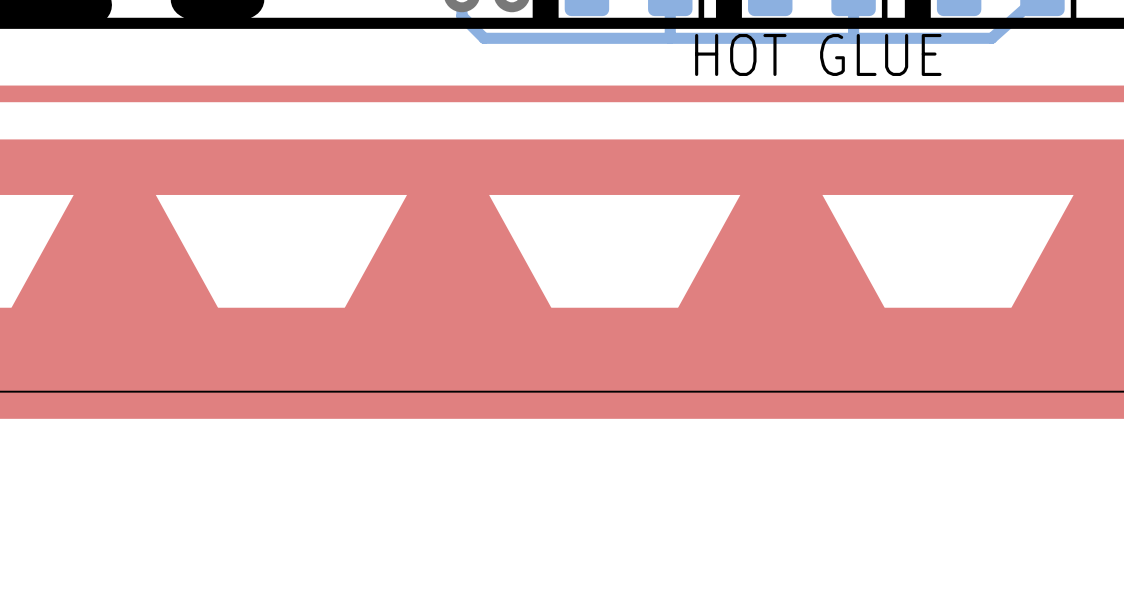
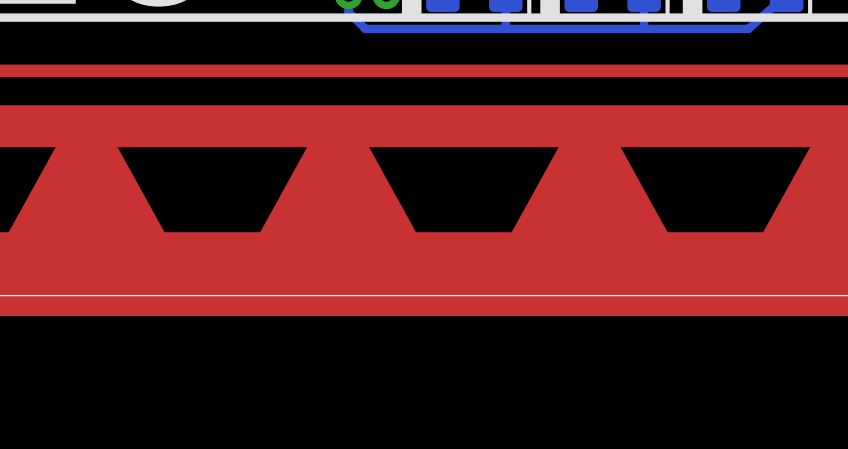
text: HOT GLUE (818, 54) -> none

